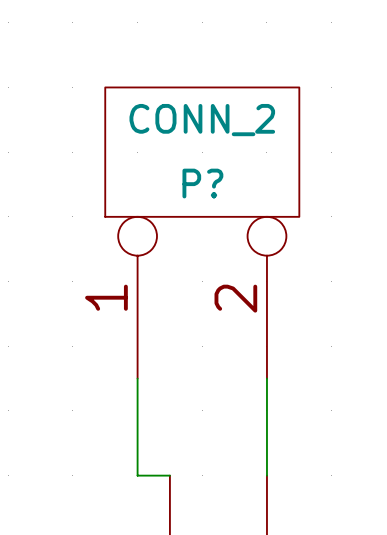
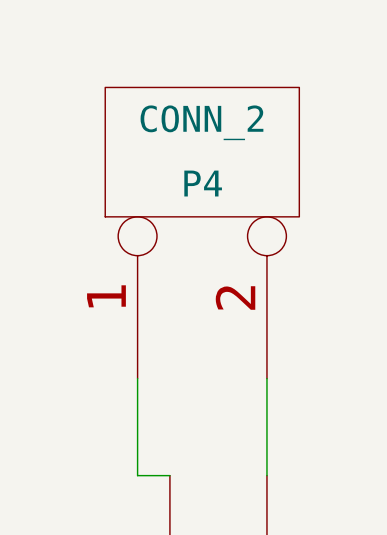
P? name: P? (202, 183) -> P4 (203, 183)

